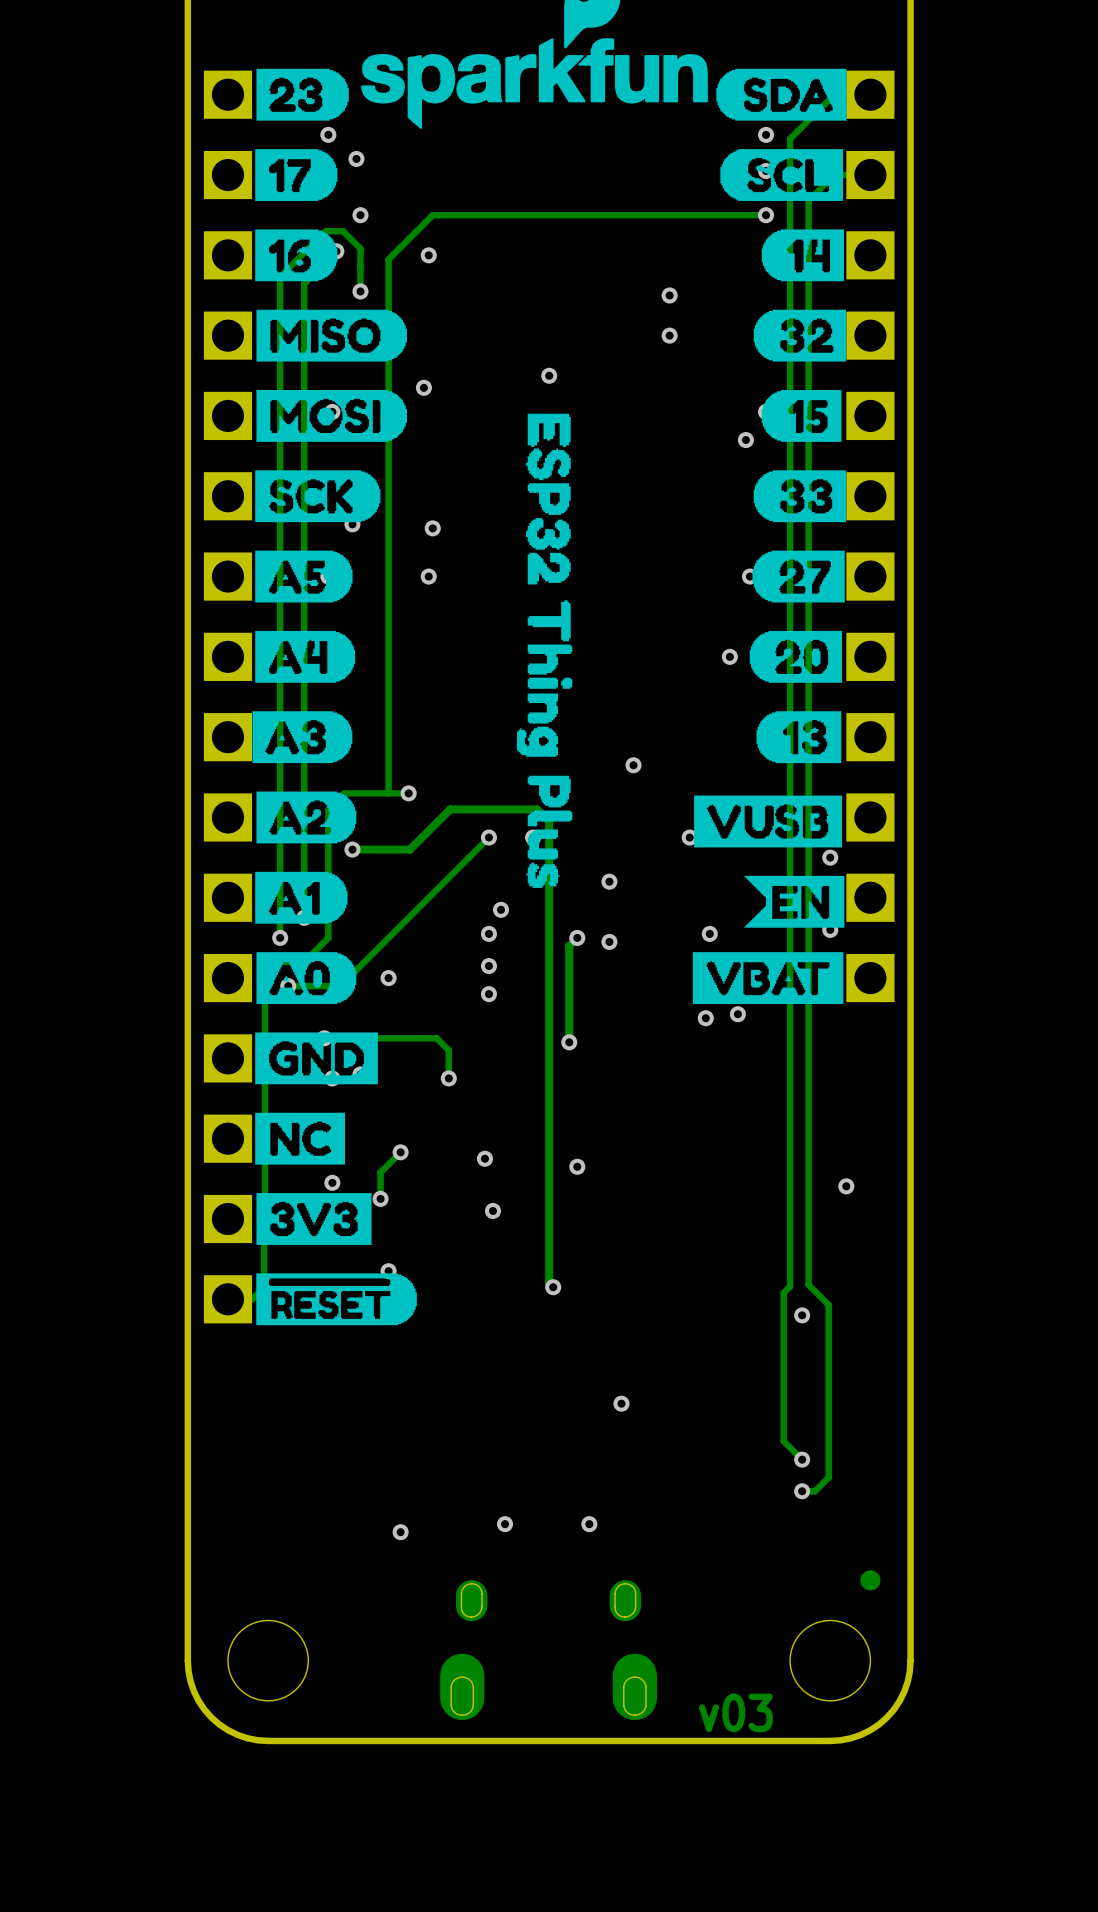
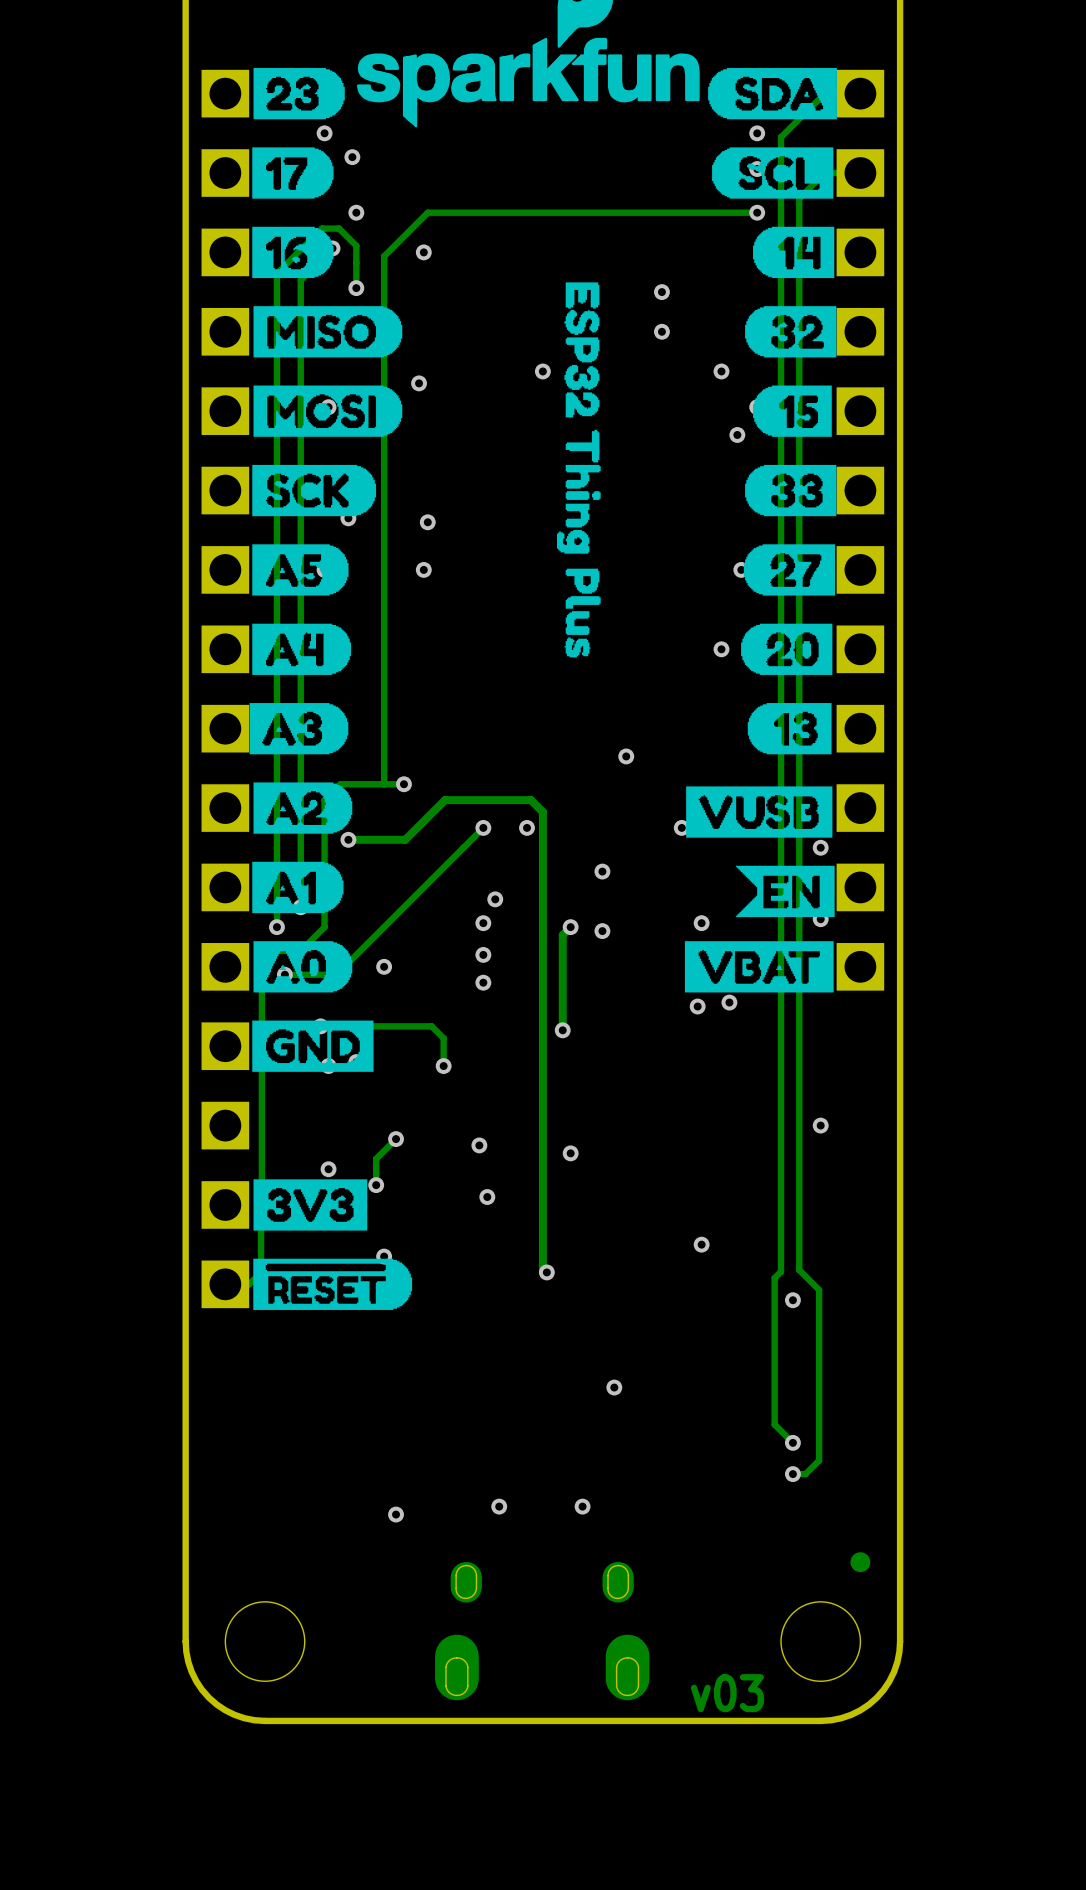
drawing: none -> [556, 282, 601, 658]
via: none -> (721, 371)
drawing: [516, 413, 573, 888] -> none
drawing: [255, 1112, 345, 1165] -> none
via position: (846, 1186) -> (820, 1125)
via: none -> (701, 1244)

